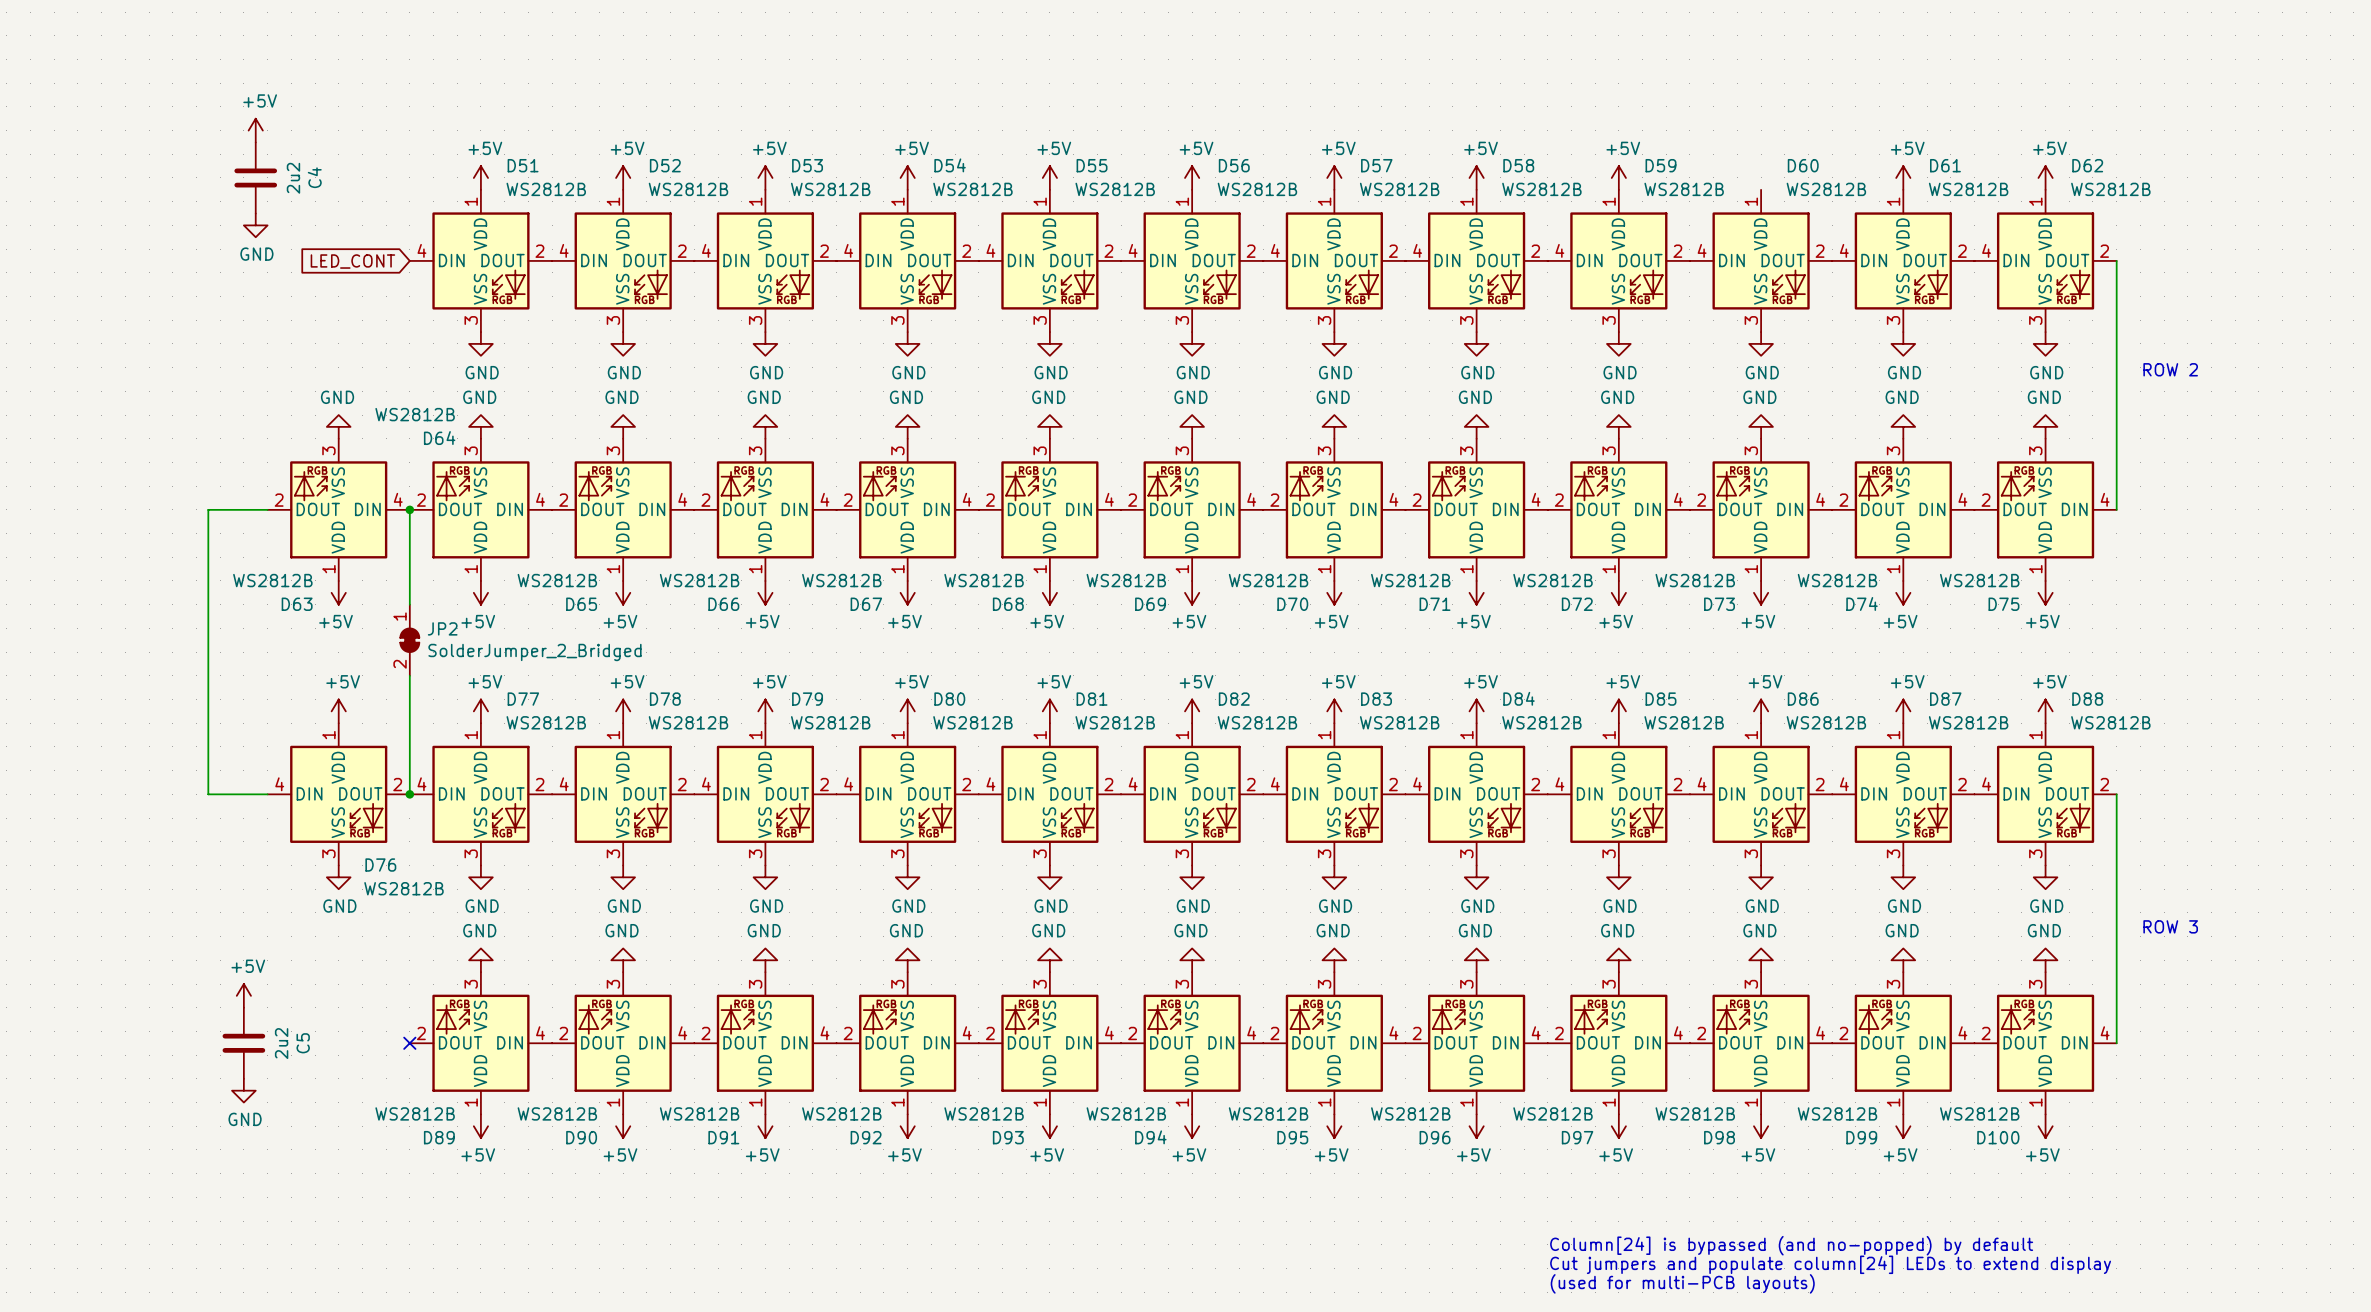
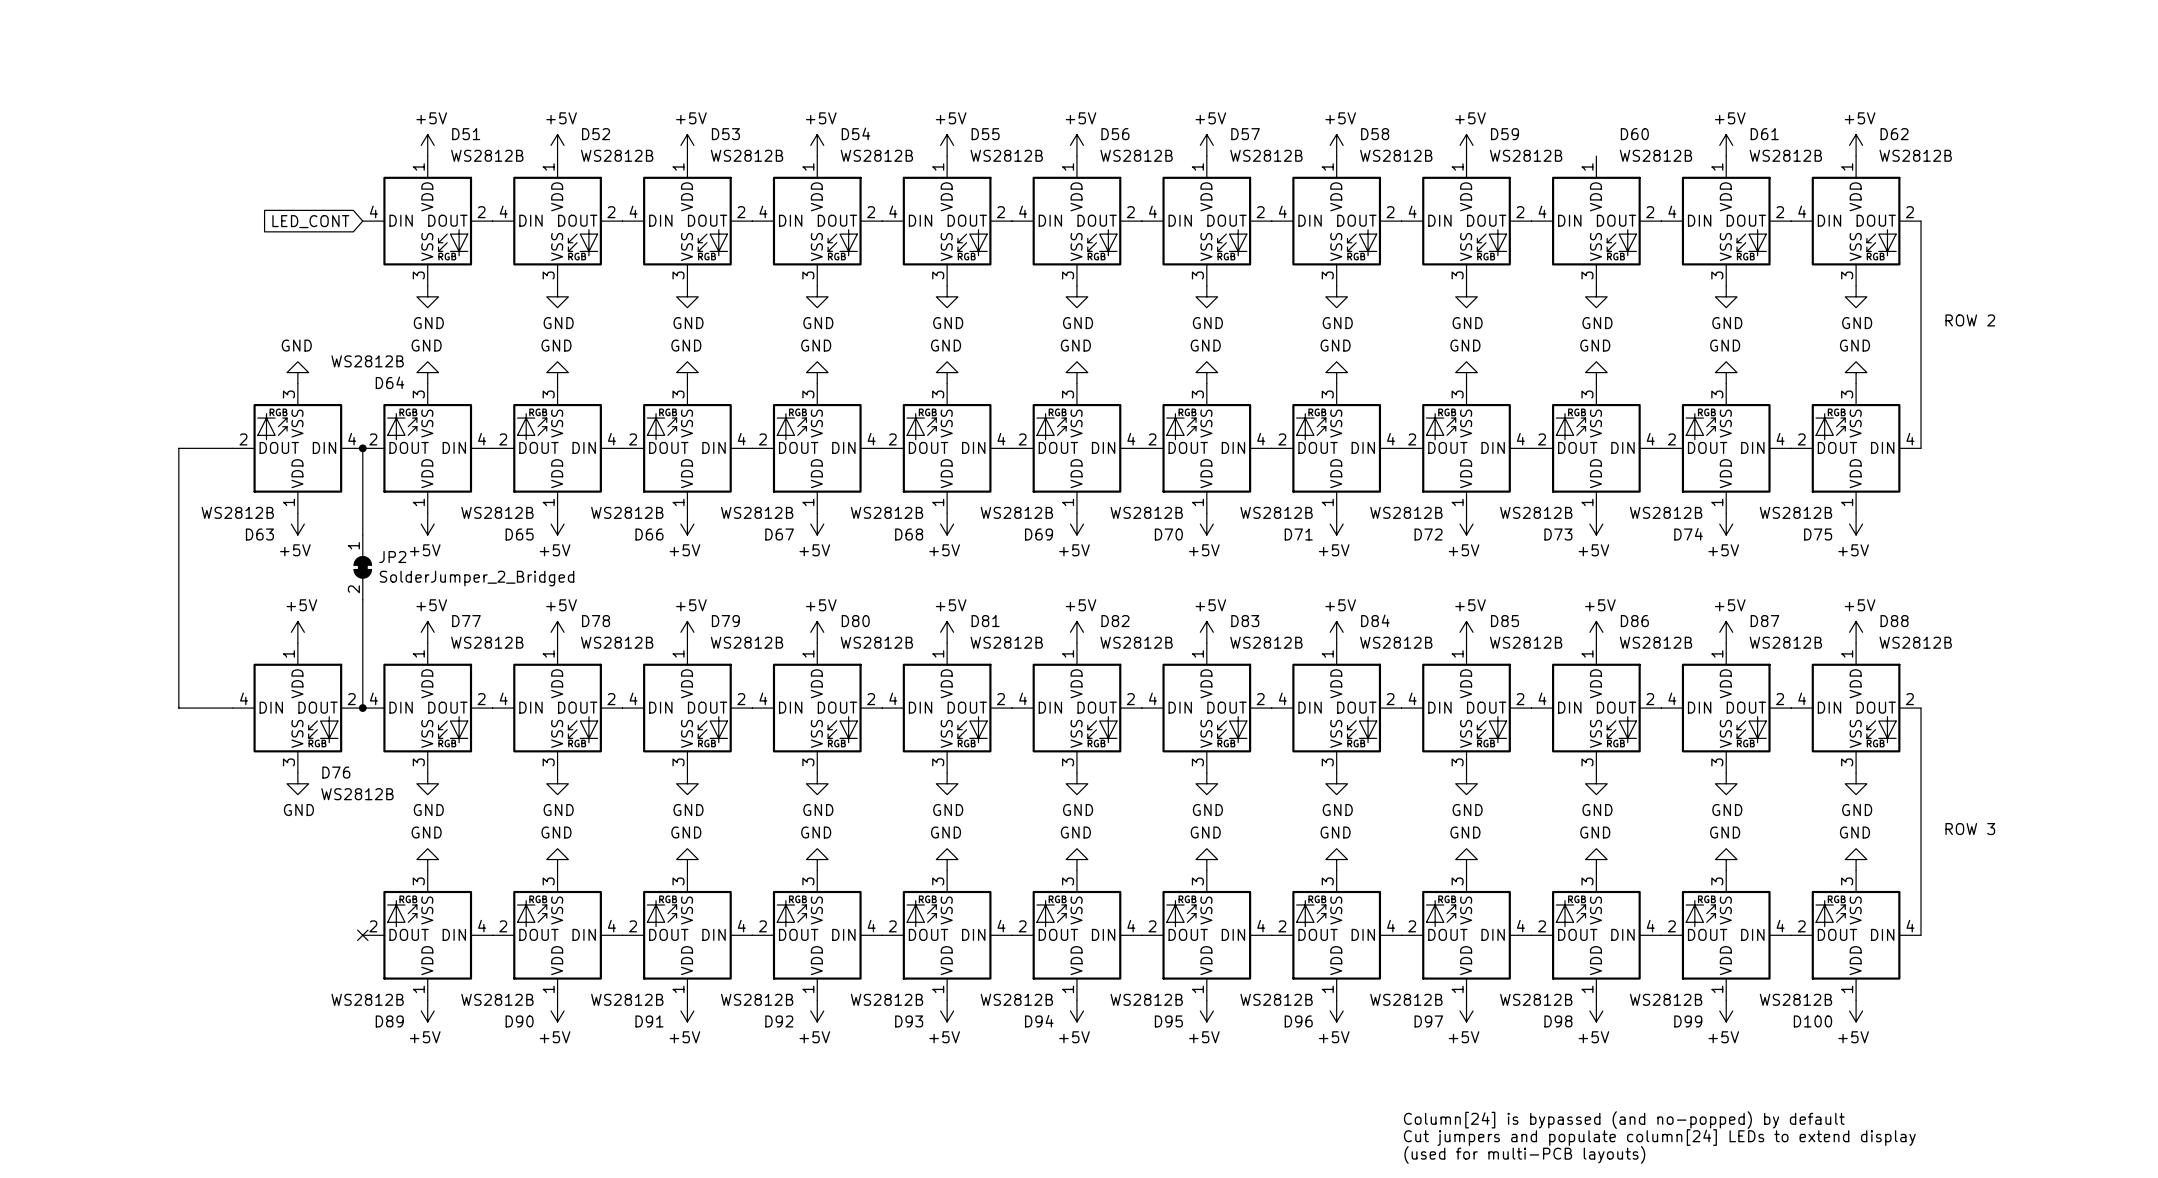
power symbol: +5V (255, 130) -> none
C4: 2u2 (255, 177) -> none
power symbol: GND (255, 225) -> none
power symbol: +5V (243, 995) -> none
C5: 2u2 (243, 1043) -> none
power symbol: GND (243, 1090) -> none

